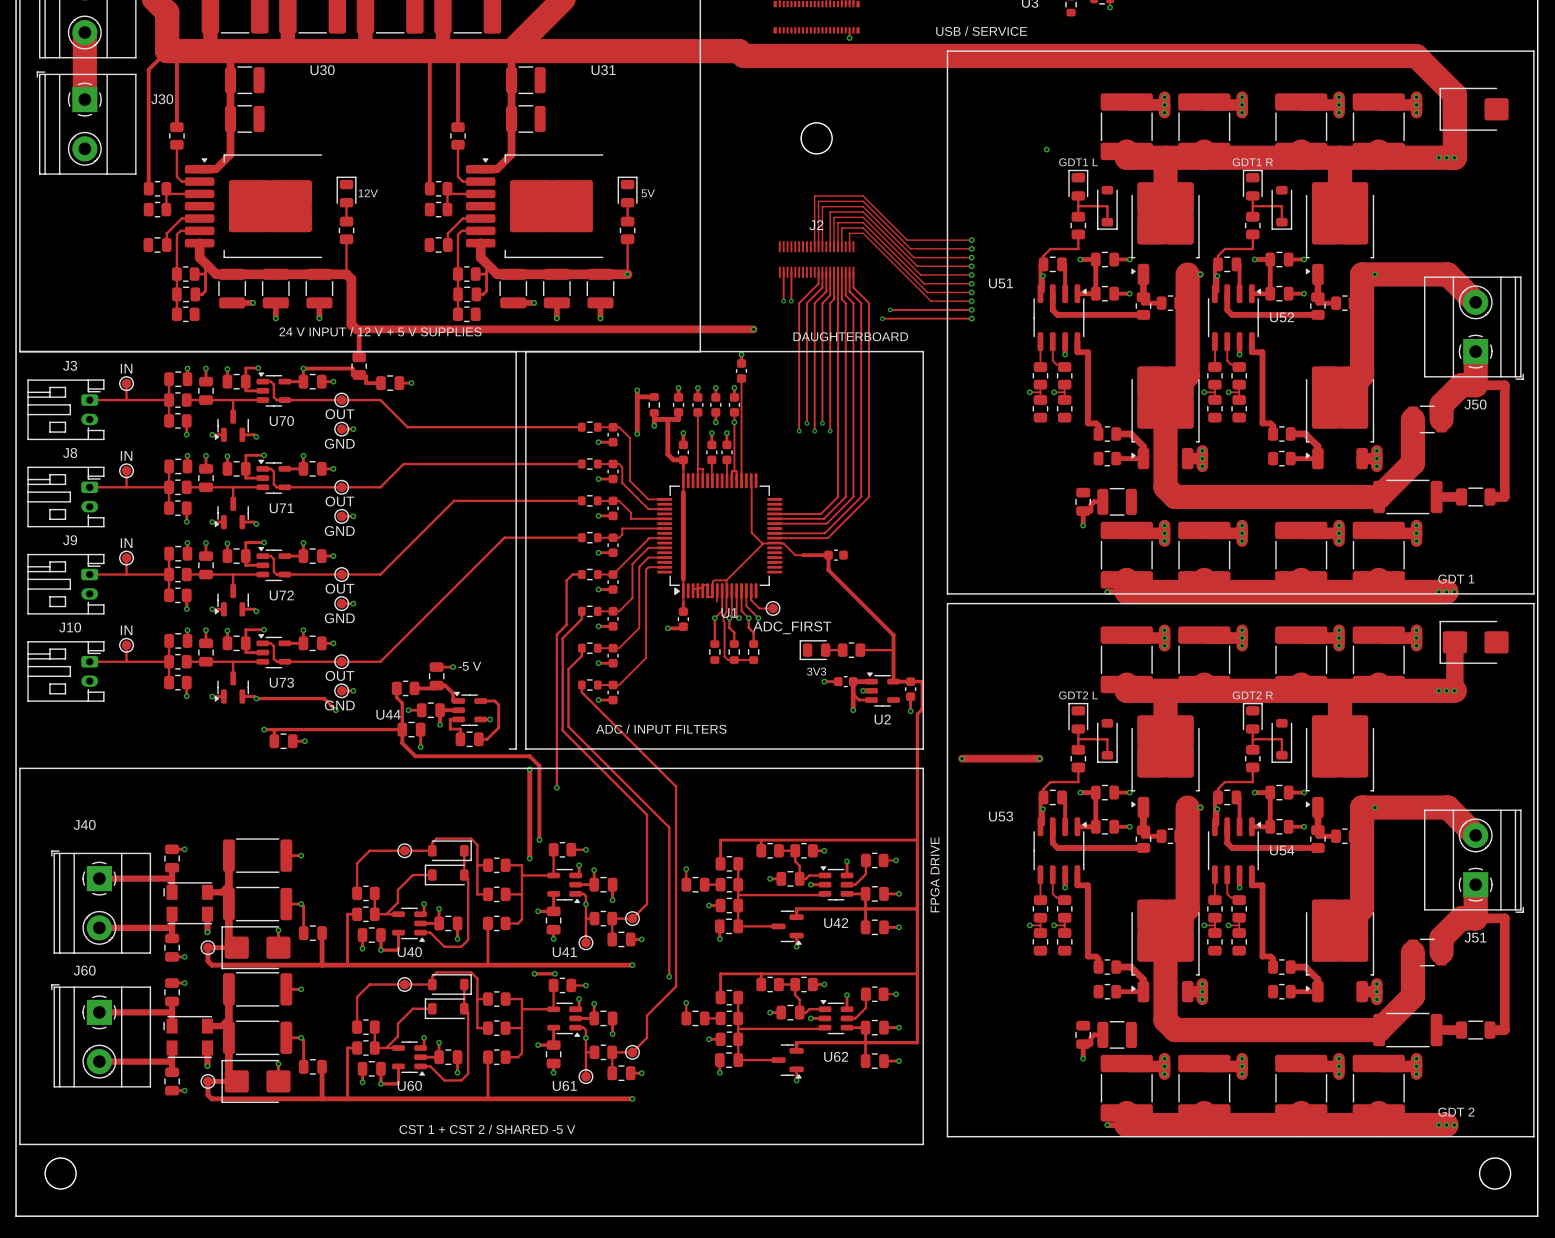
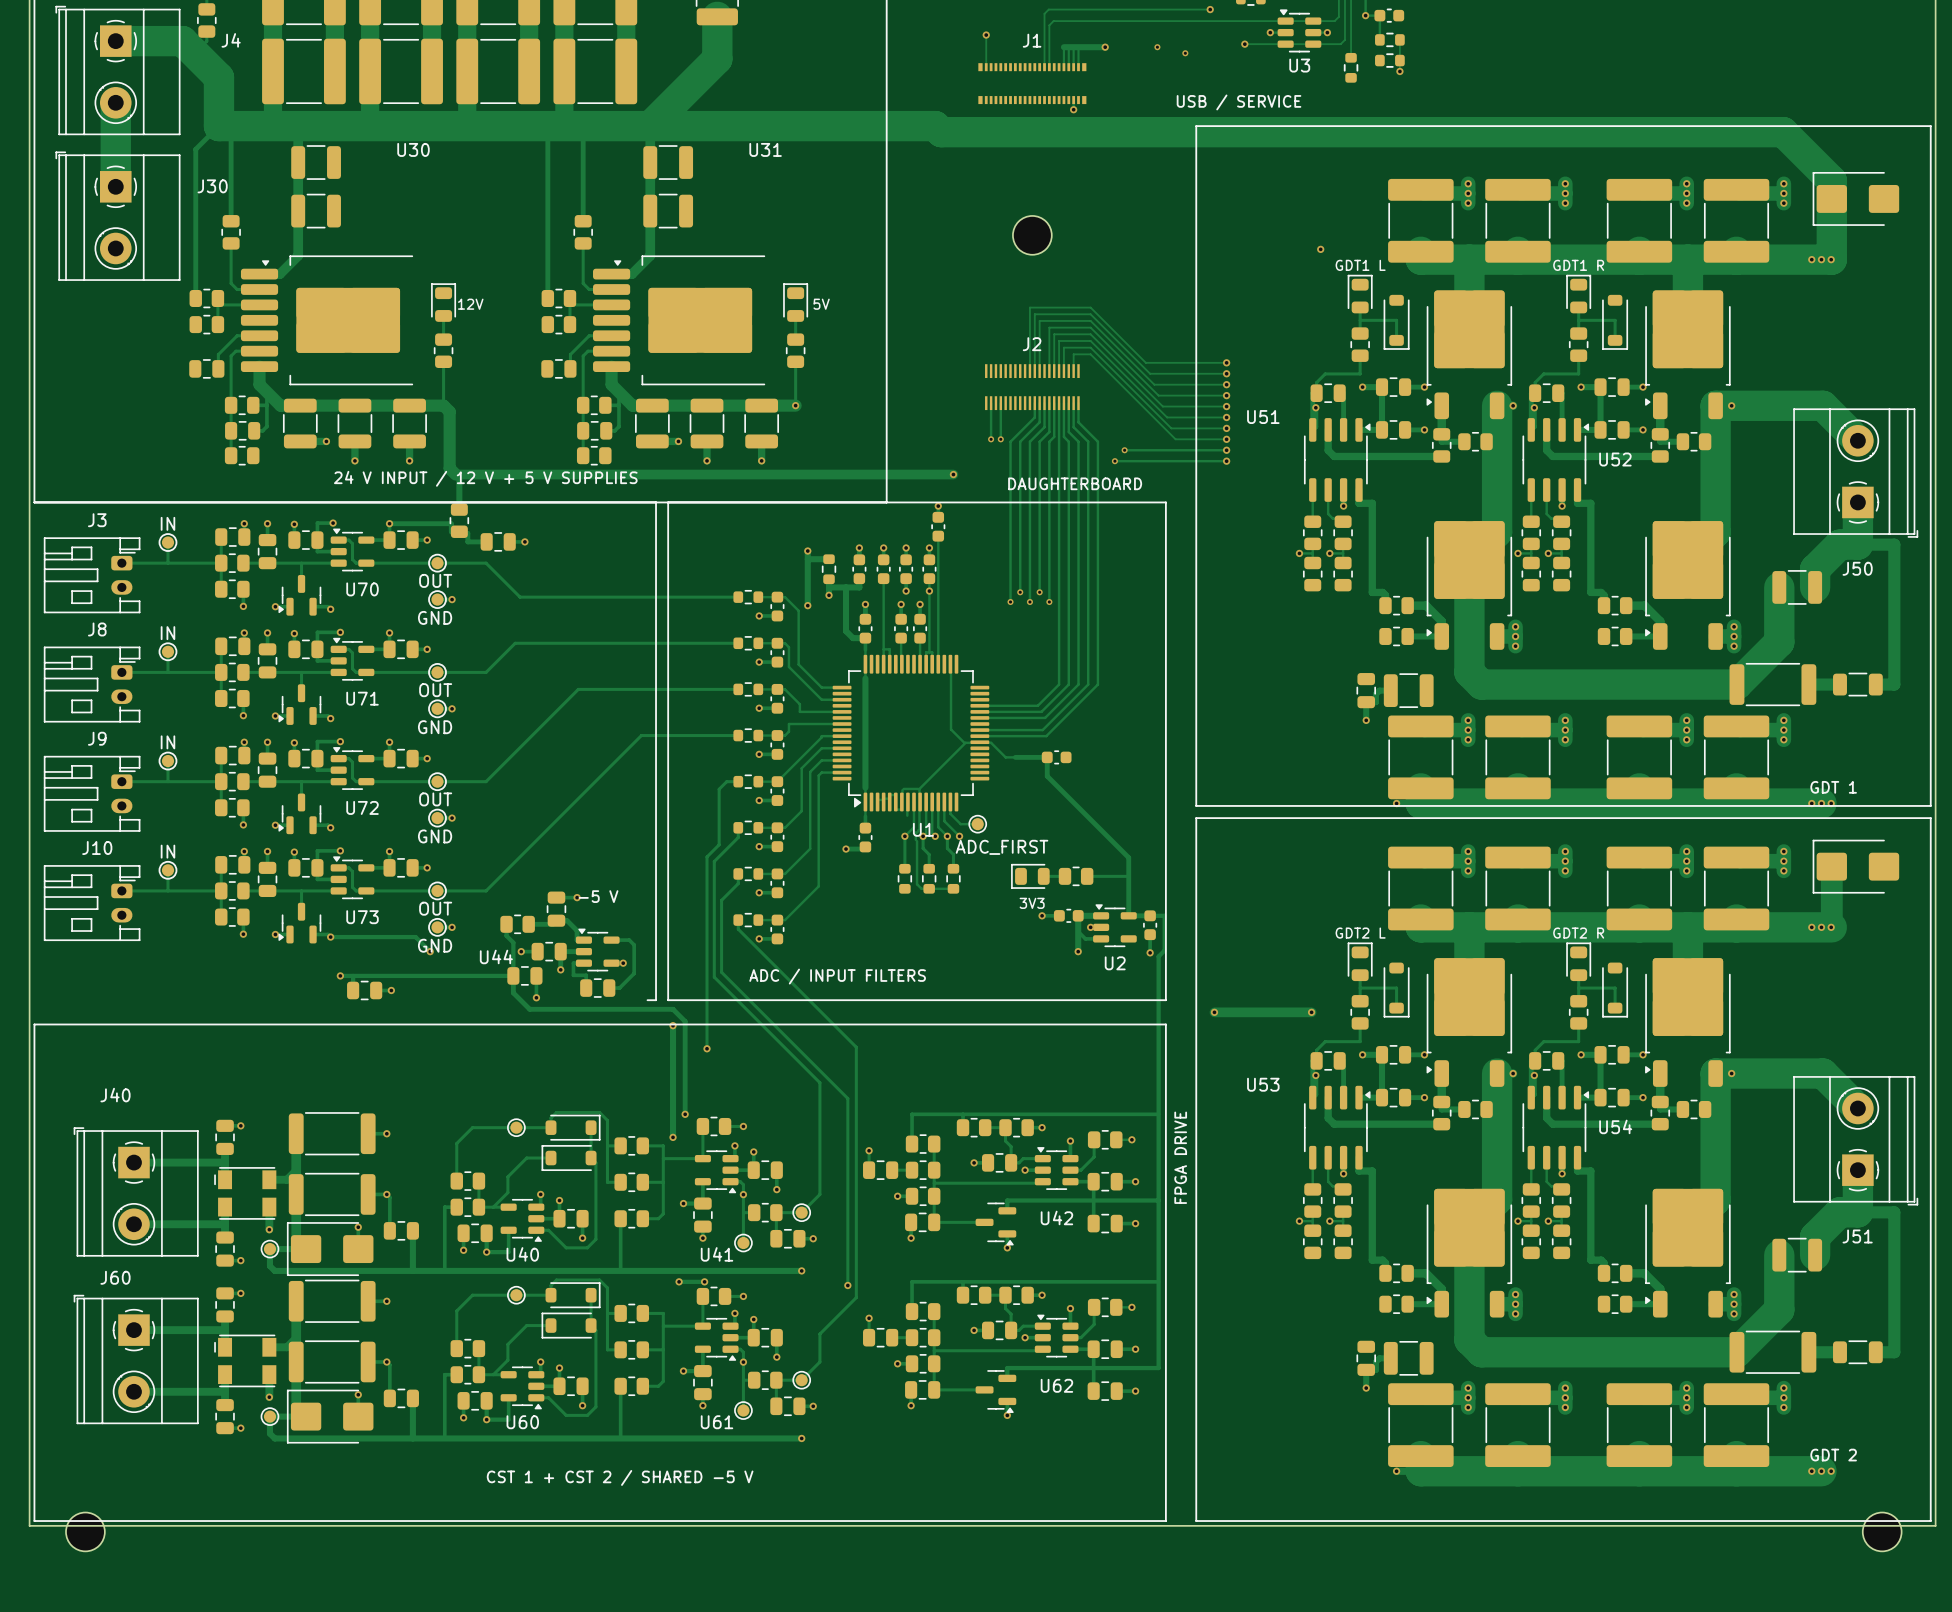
line: (947, 1136) (1533, 1136) -> (1196, 1485) (1196, 1521) (1930, 1521) (1930, 1485)
line: (19, 1144) (923, 1144) -> (34, 1495) (34, 1521) (1165, 1521) (1165, 1495)
board edge: (16, 1168) (16, 1216) (1537, 1216) (1537, 1168) -> (29, 1525) (1935, 1525)

